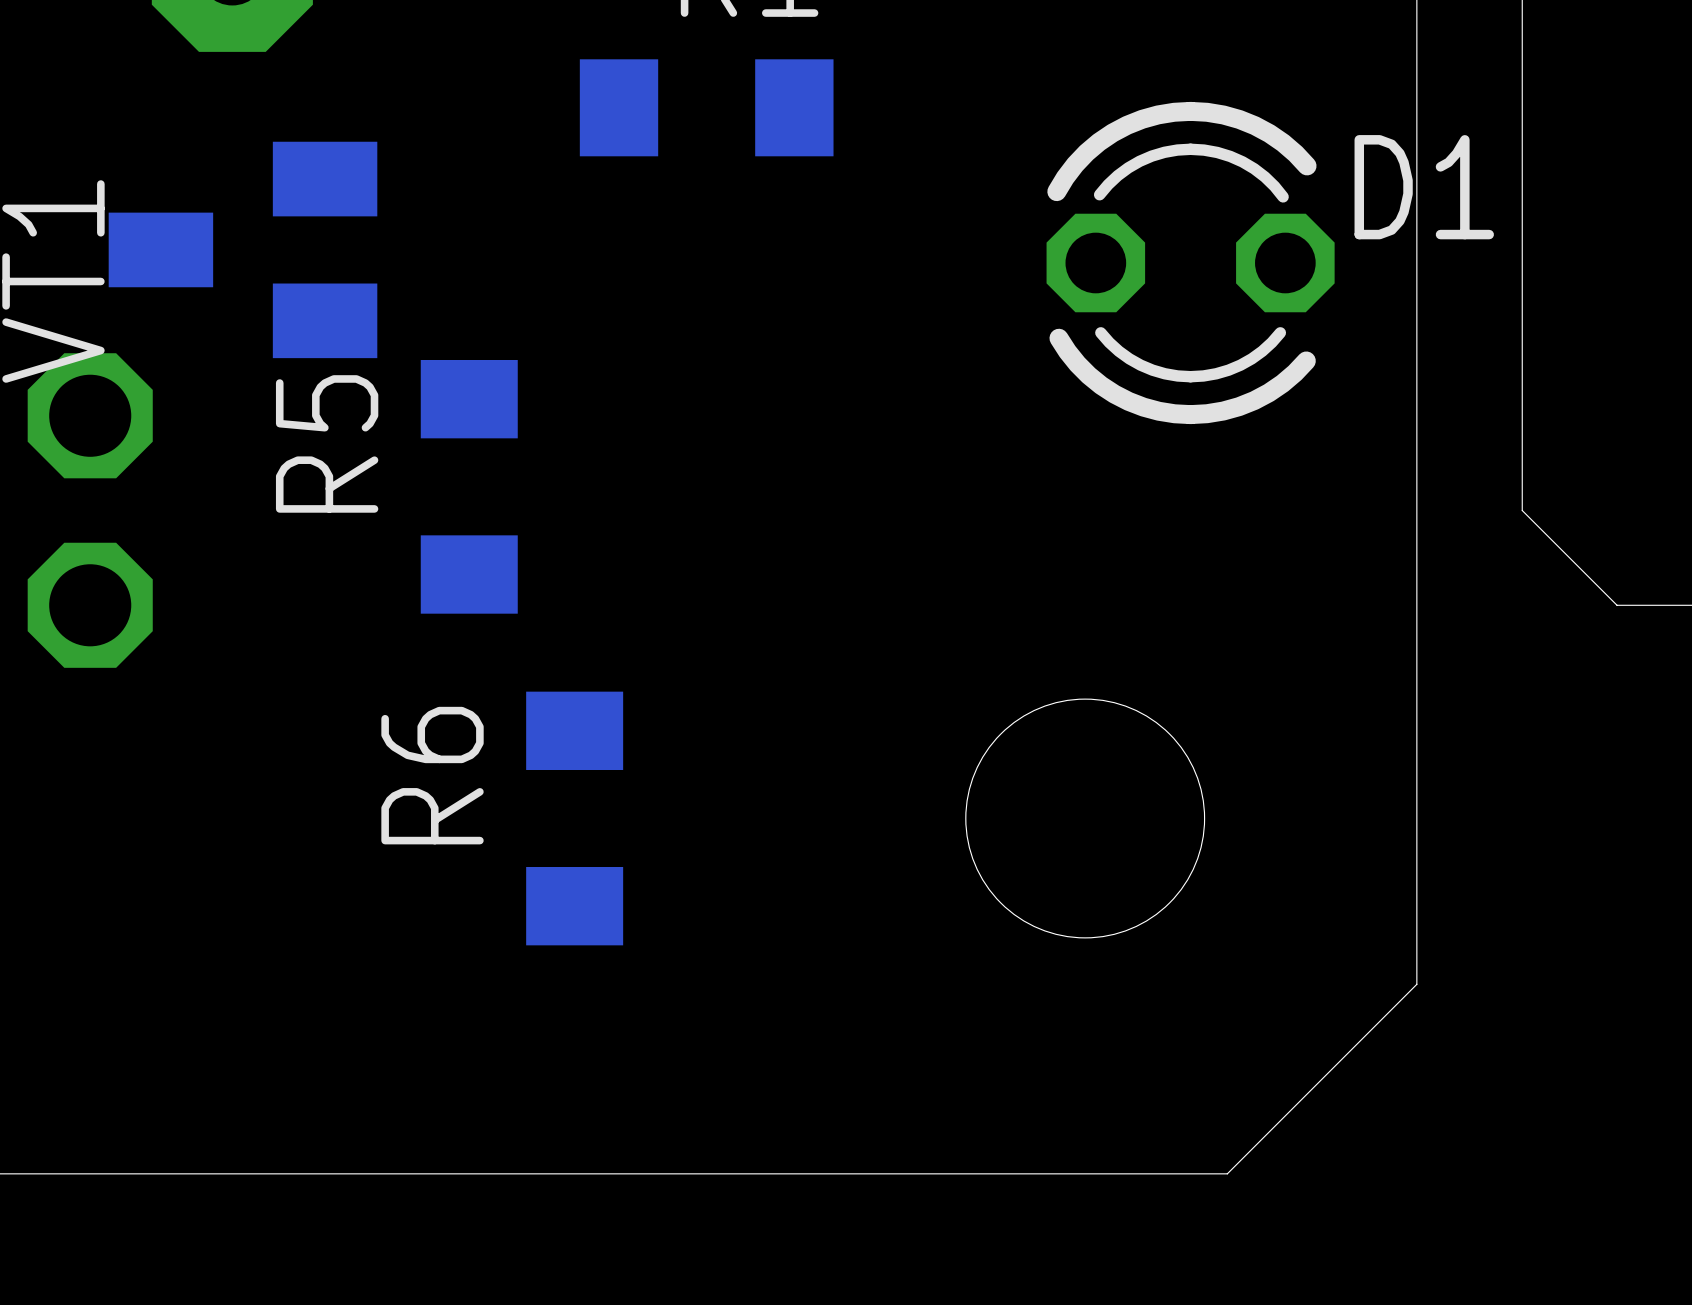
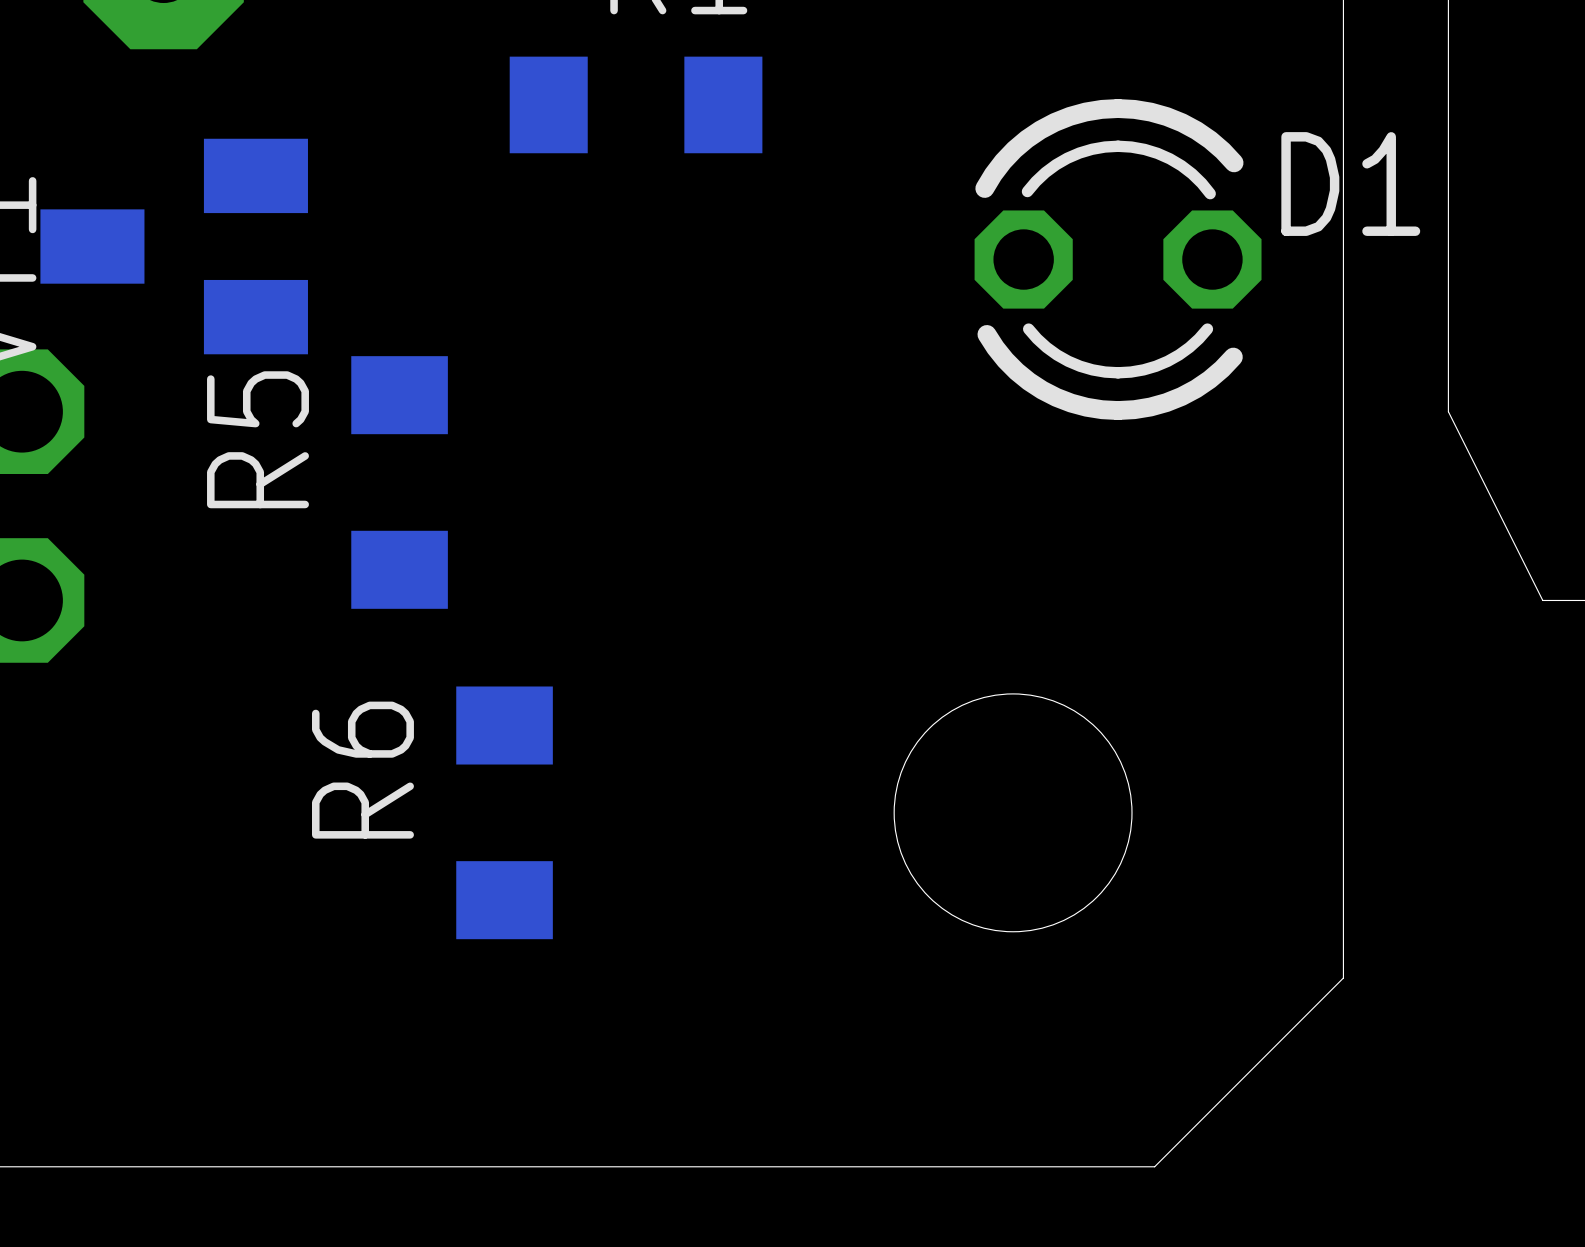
board edge: (1522, 415) (1522, 510) (1617, 605) -> (1448, 411) (1542, 600)

